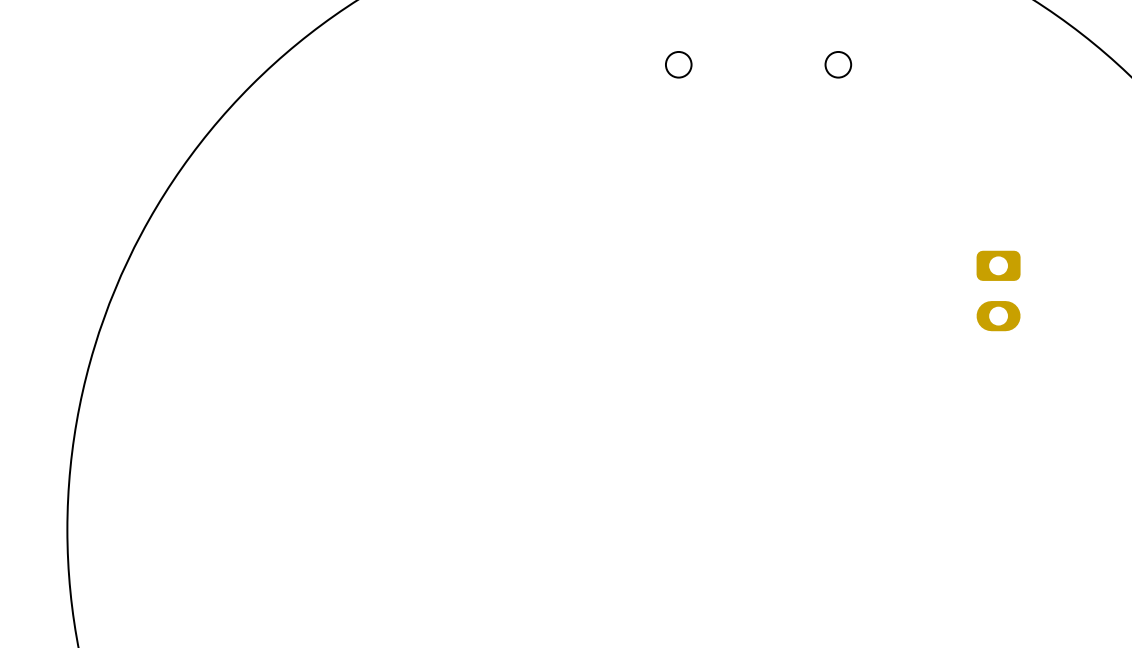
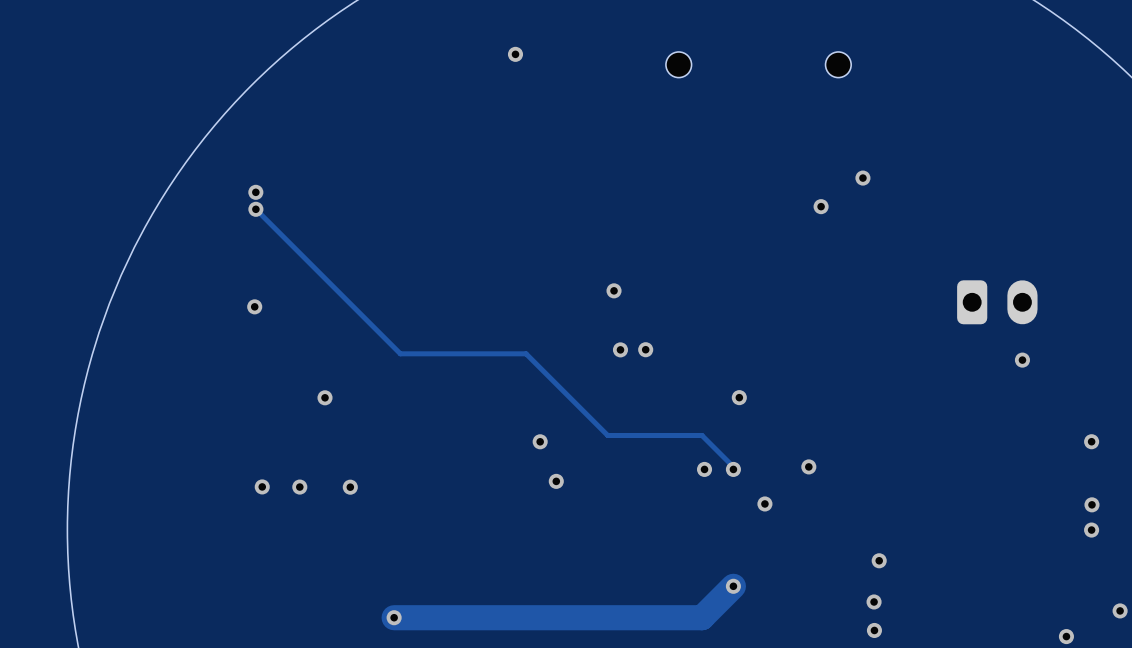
via: none -> (515, 54)
via: none -> (862, 178)
via: none -> (255, 192)
via: none -> (821, 206)
track: none -> (255, 209) (400, 353) (526, 353) (607, 435) (702, 435) (733, 466) (733, 469)
via: none -> (255, 209)
via: none -> (614, 290)
part rotation: 0° (998, 290) -> 90° counterclockwise (997, 302)
via: none -> (254, 306)
via: none -> (620, 349)
via: none -> (645, 349)
via: none -> (1022, 360)
via: none -> (325, 397)
via: none -> (739, 397)
via: none -> (540, 441)
via: none -> (1091, 441)
via: none -> (808, 466)
via: none -> (704, 469)
via: none -> (733, 469)
via: none -> (556, 481)
via: none -> (262, 486)
via: none -> (299, 487)
via: none -> (350, 487)
via: none -> (764, 503)
via: none -> (1091, 504)
via: none -> (1091, 530)
via: none -> (879, 560)
track: none -> (733, 586) (702, 617) (394, 617)
via: none -> (733, 586)
via: none -> (874, 601)
via: none -> (1120, 610)
via: none -> (394, 617)
via: none -> (874, 630)
via: none -> (1066, 636)

